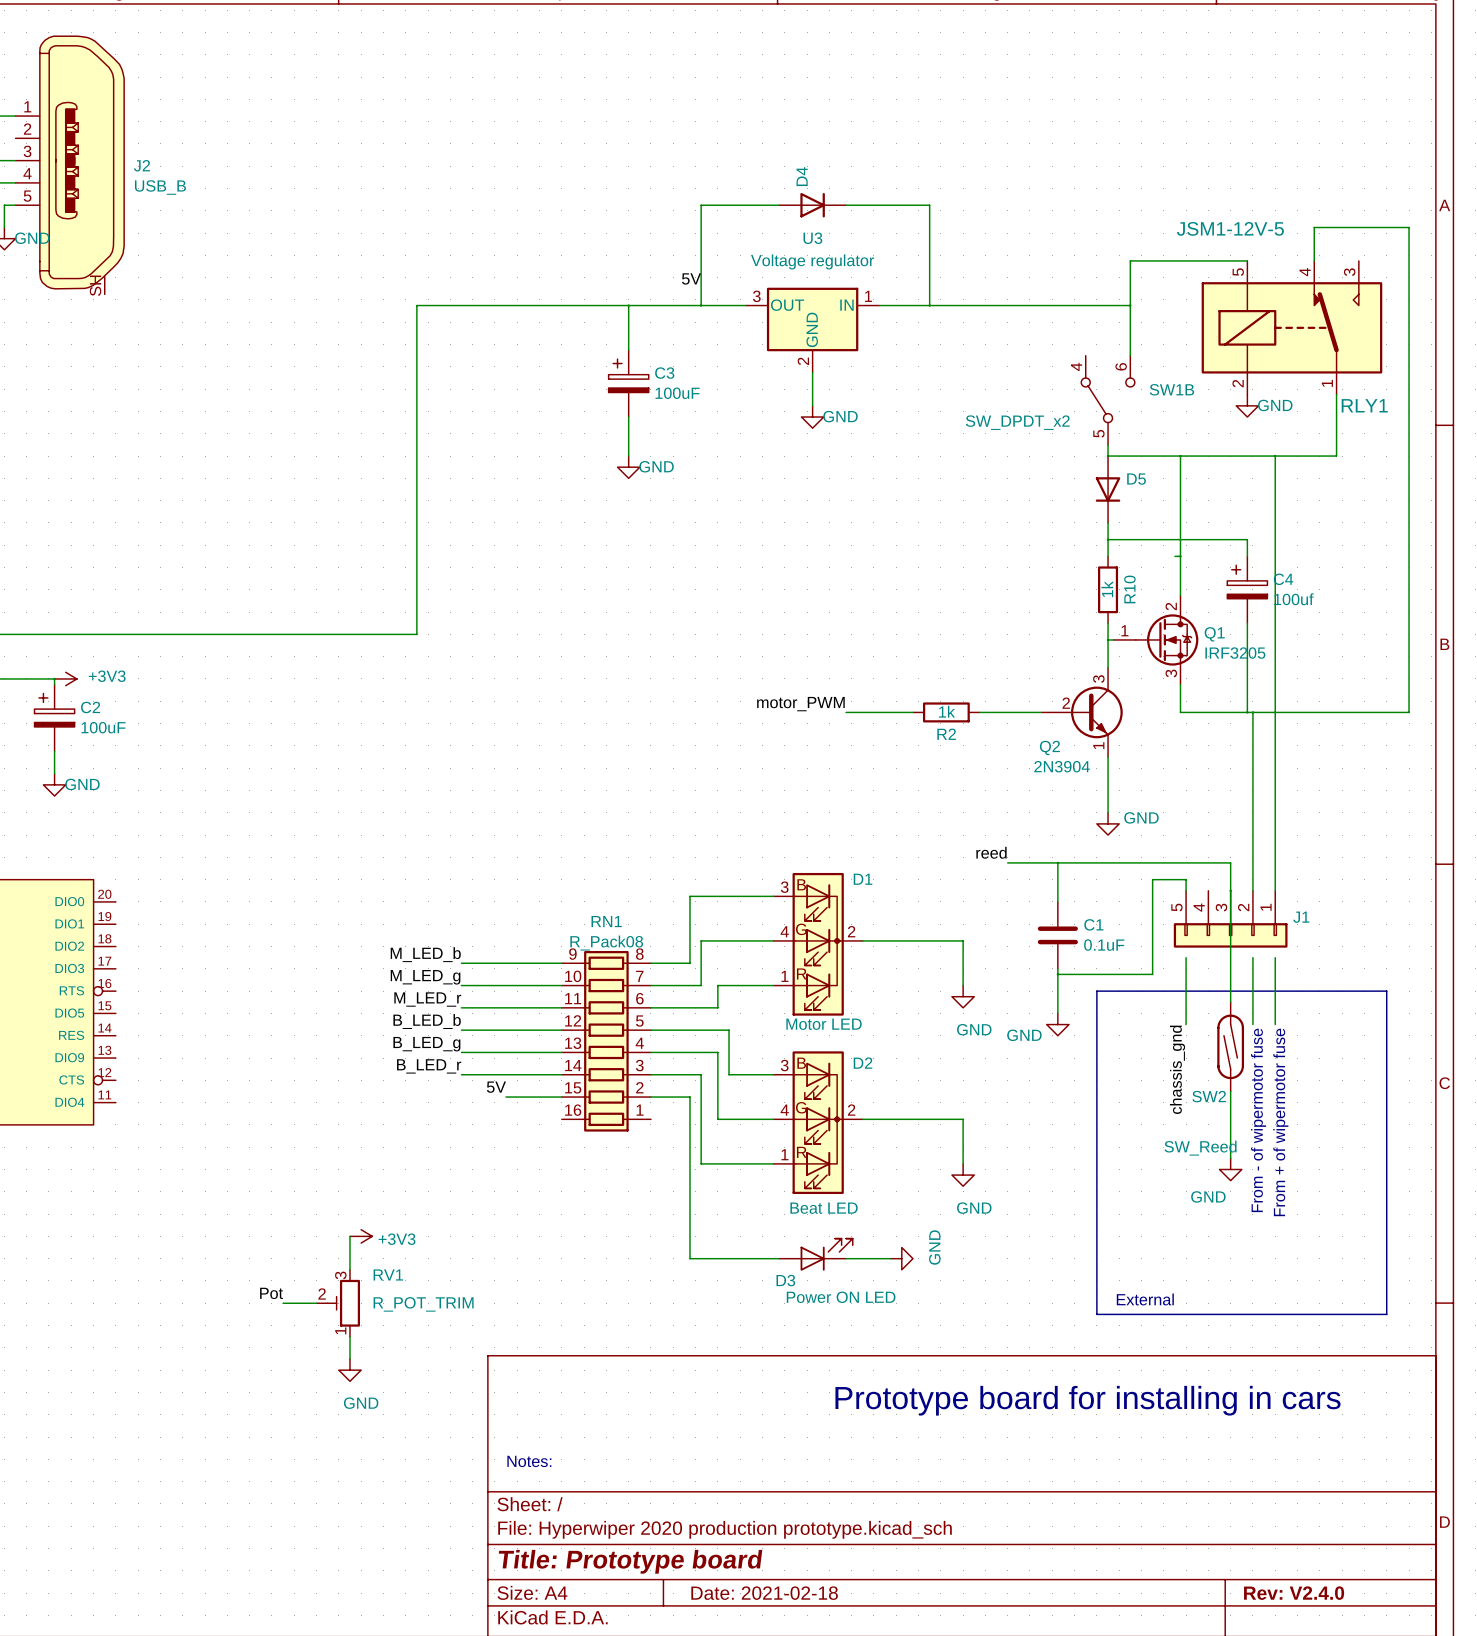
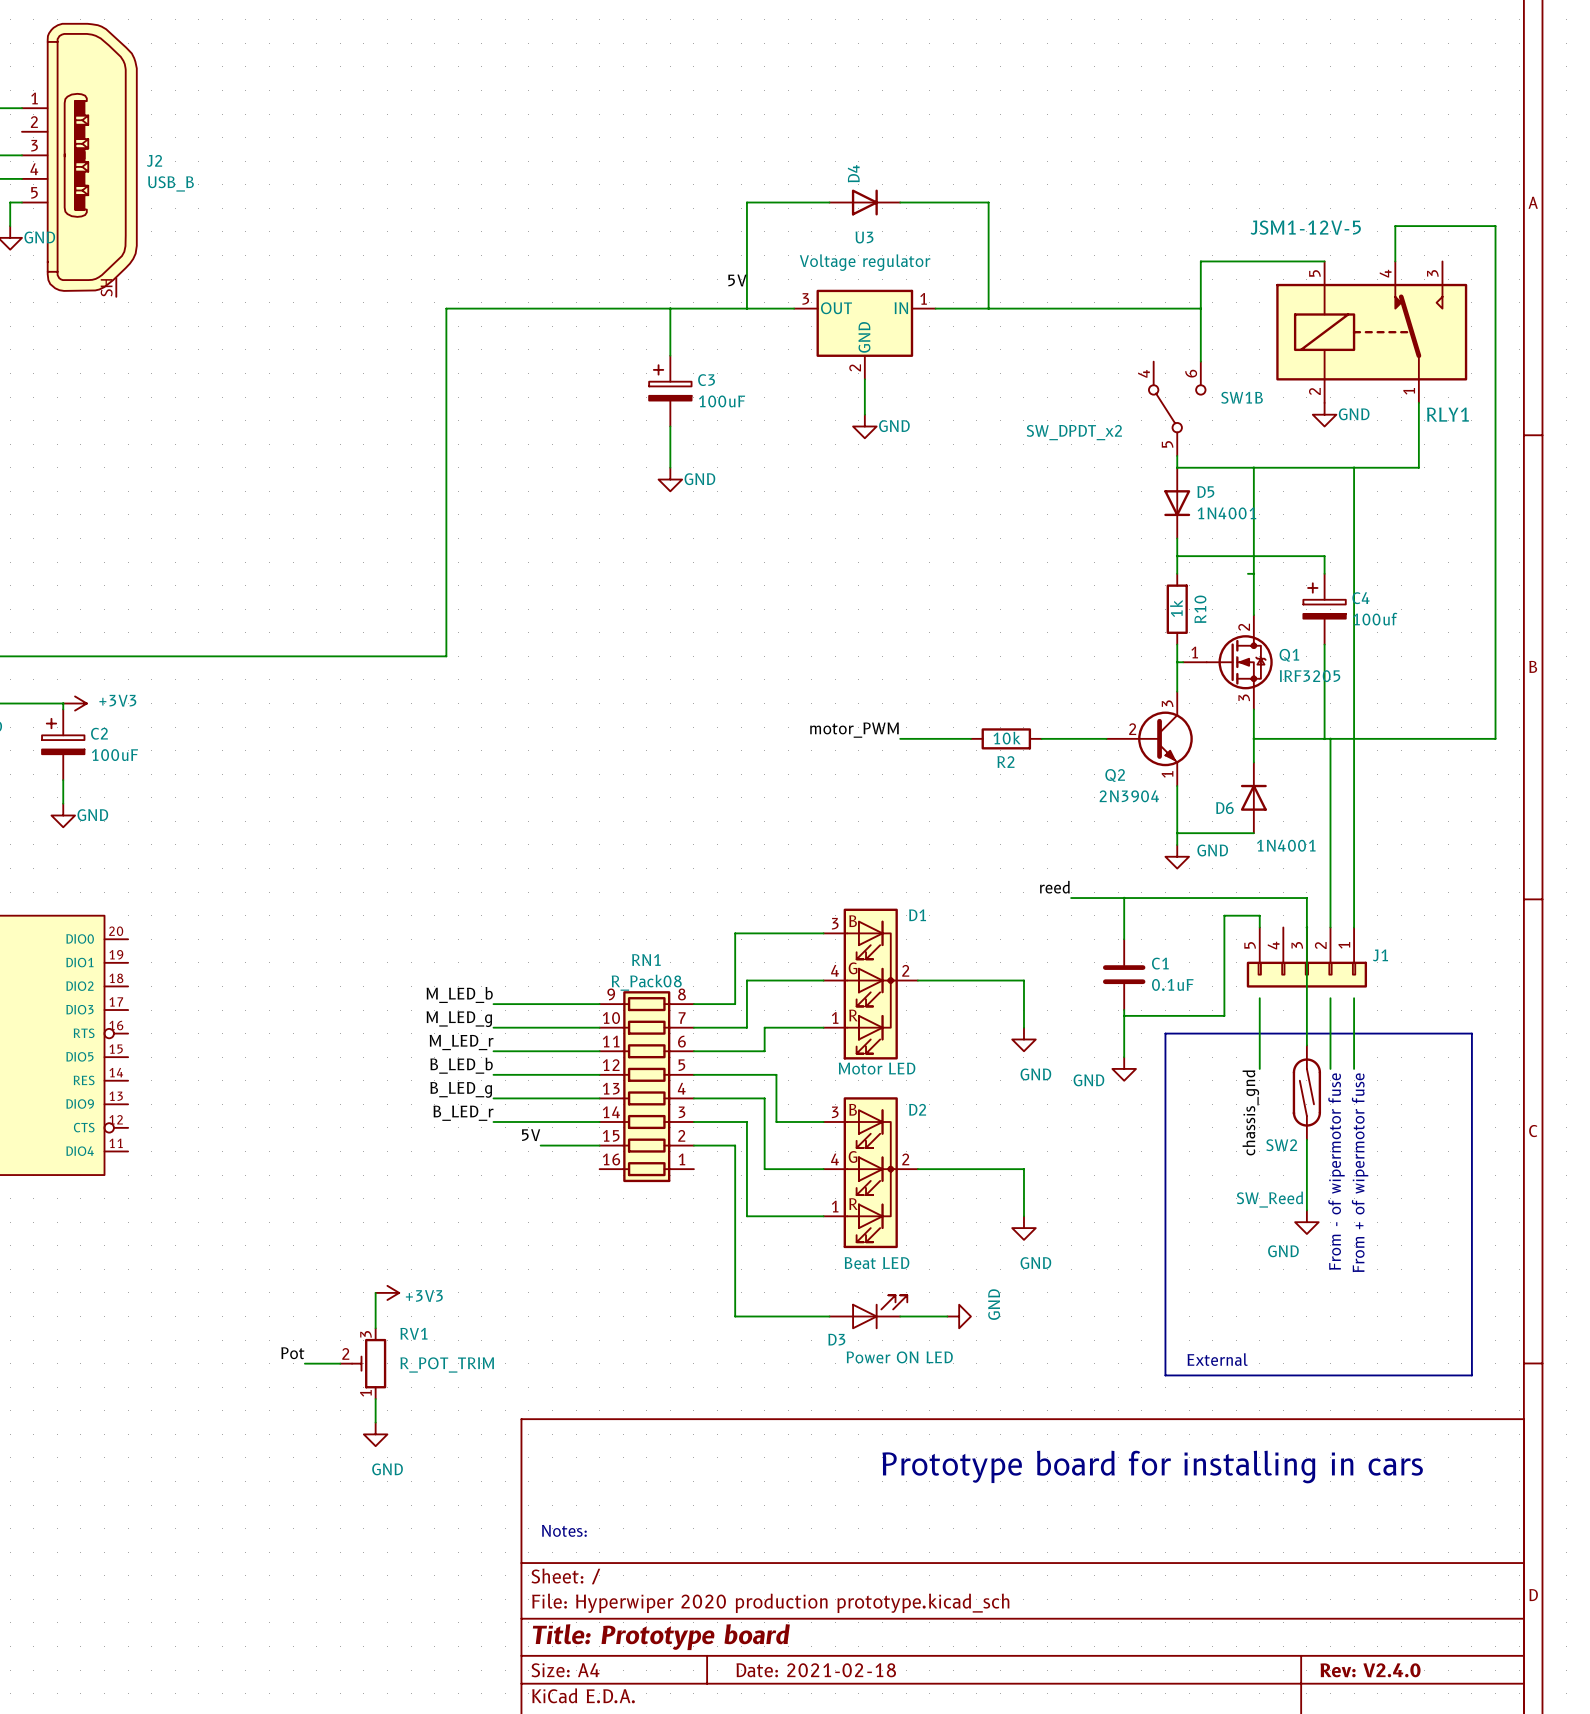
D5 value: none -> 1N4001 (1226, 513)
R2 value: 1k (947, 711) -> 10k (1007, 738)
wire: none -> (1253, 738) (1253, 762)
D6: none -> 1N4001 (1253, 797)
wire: none -> (1177, 833) (1253, 833)

